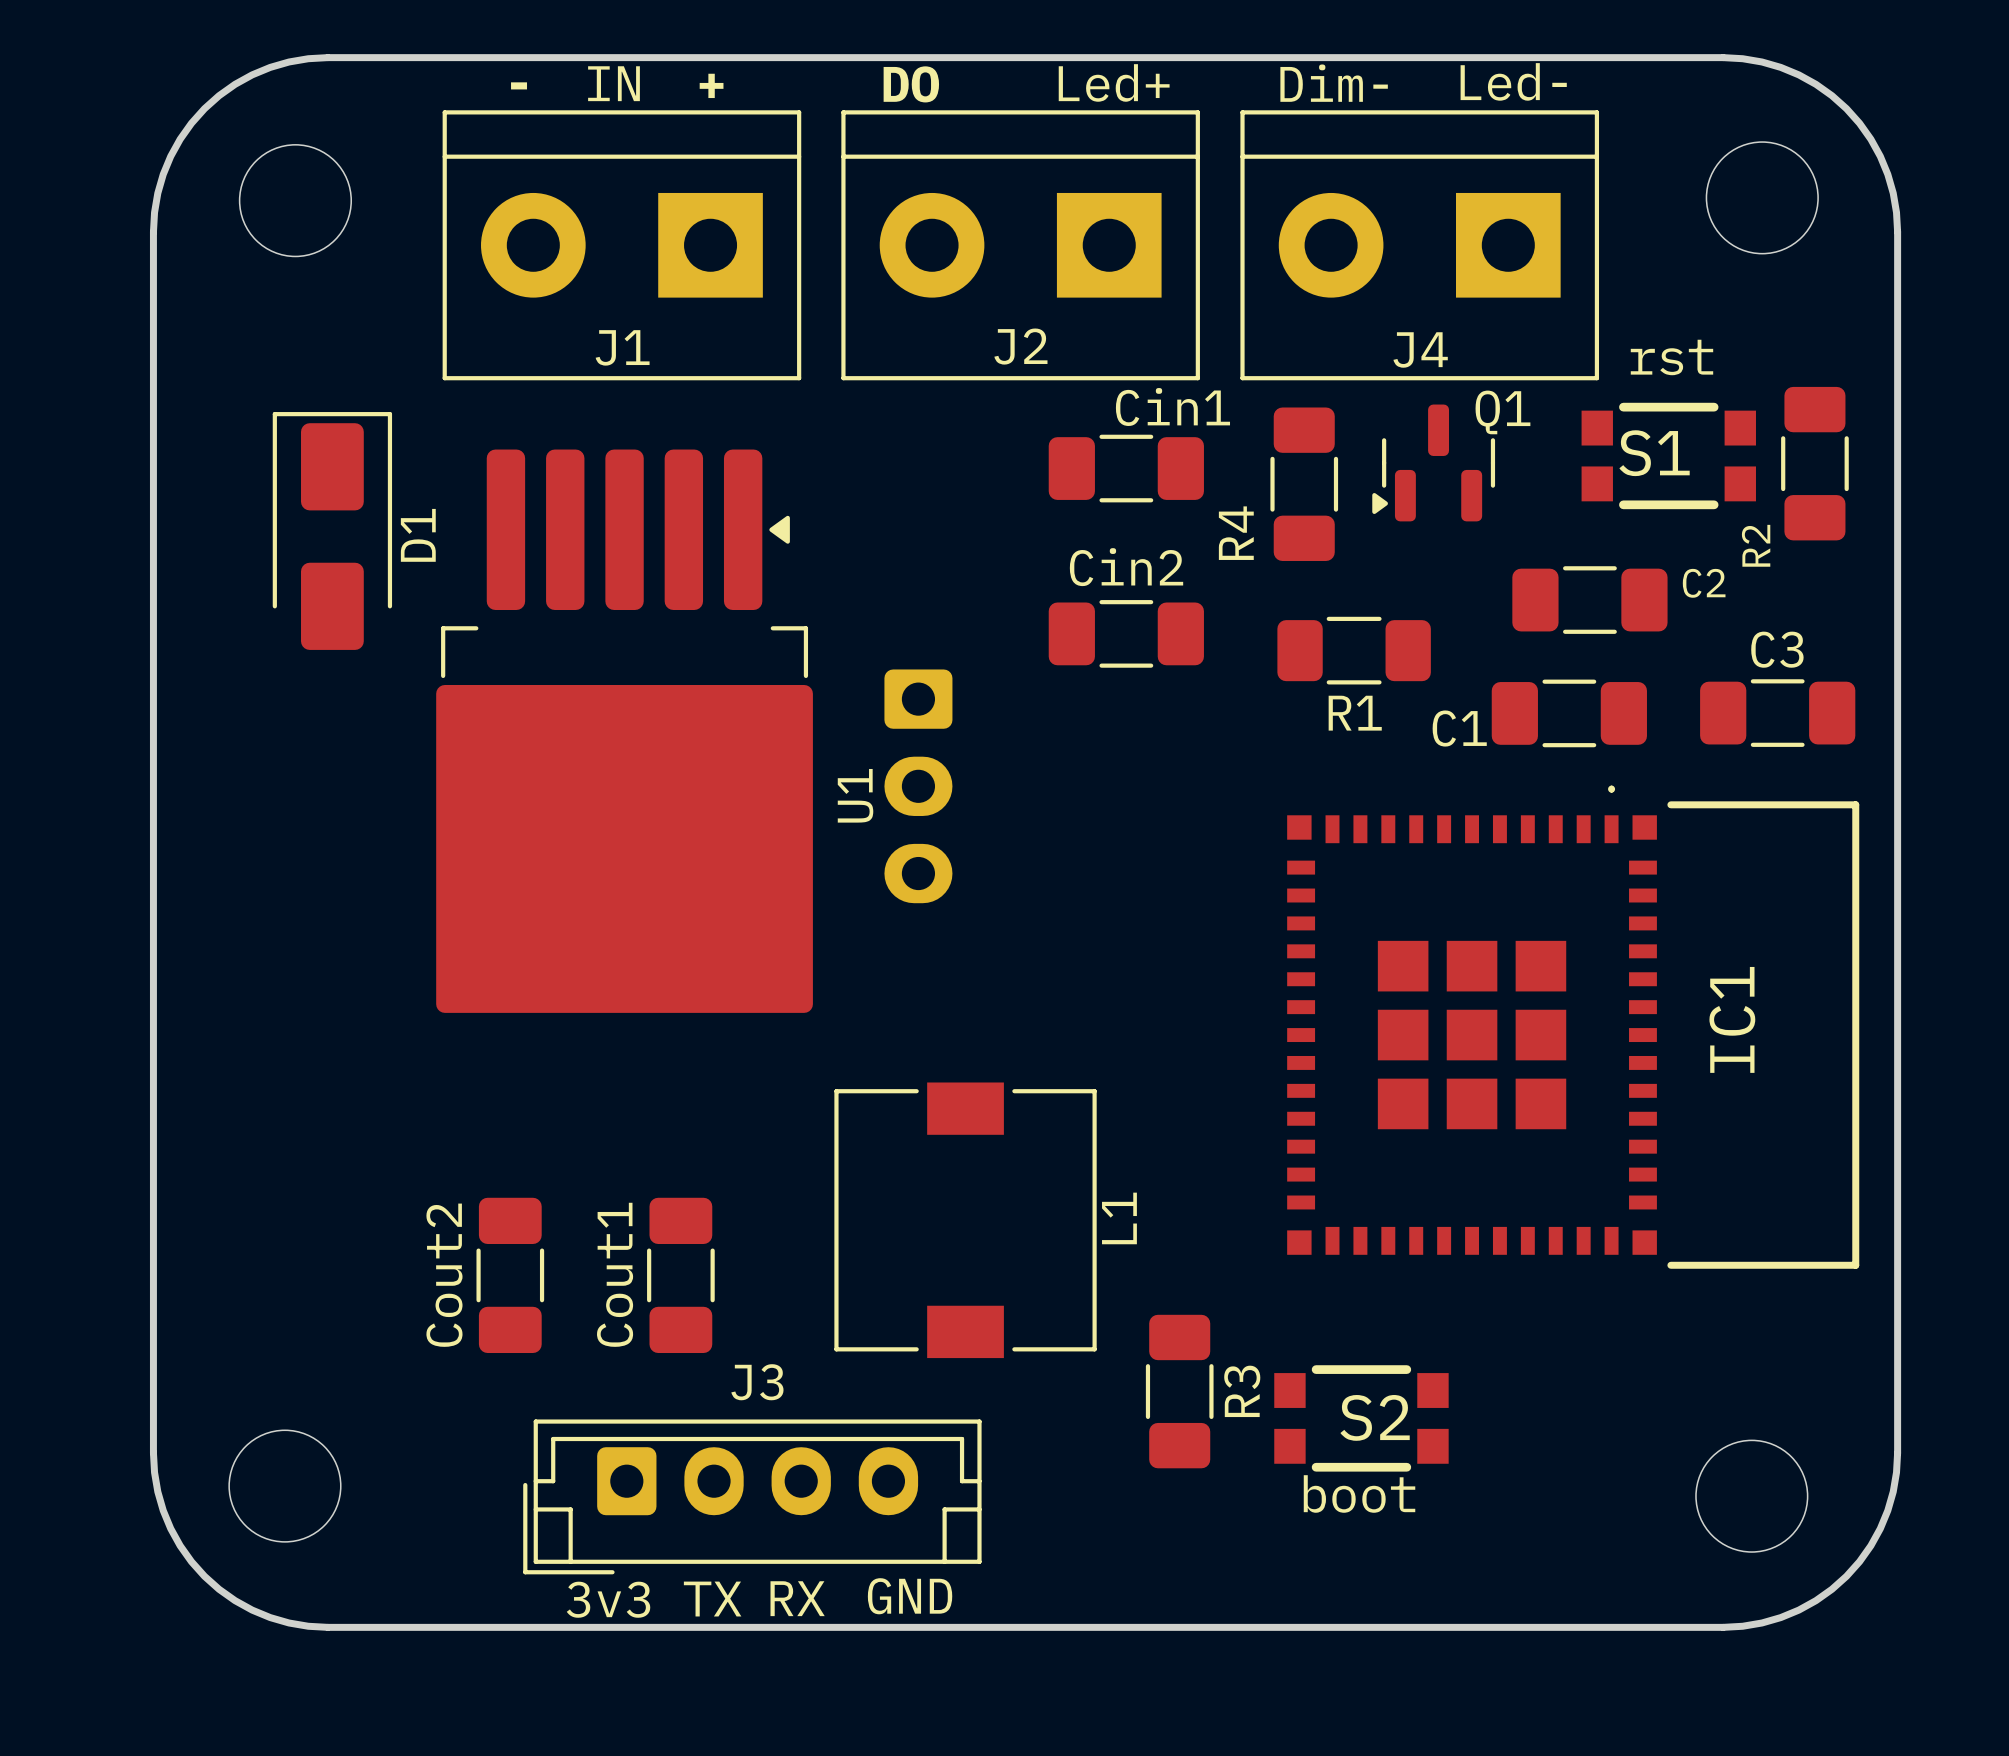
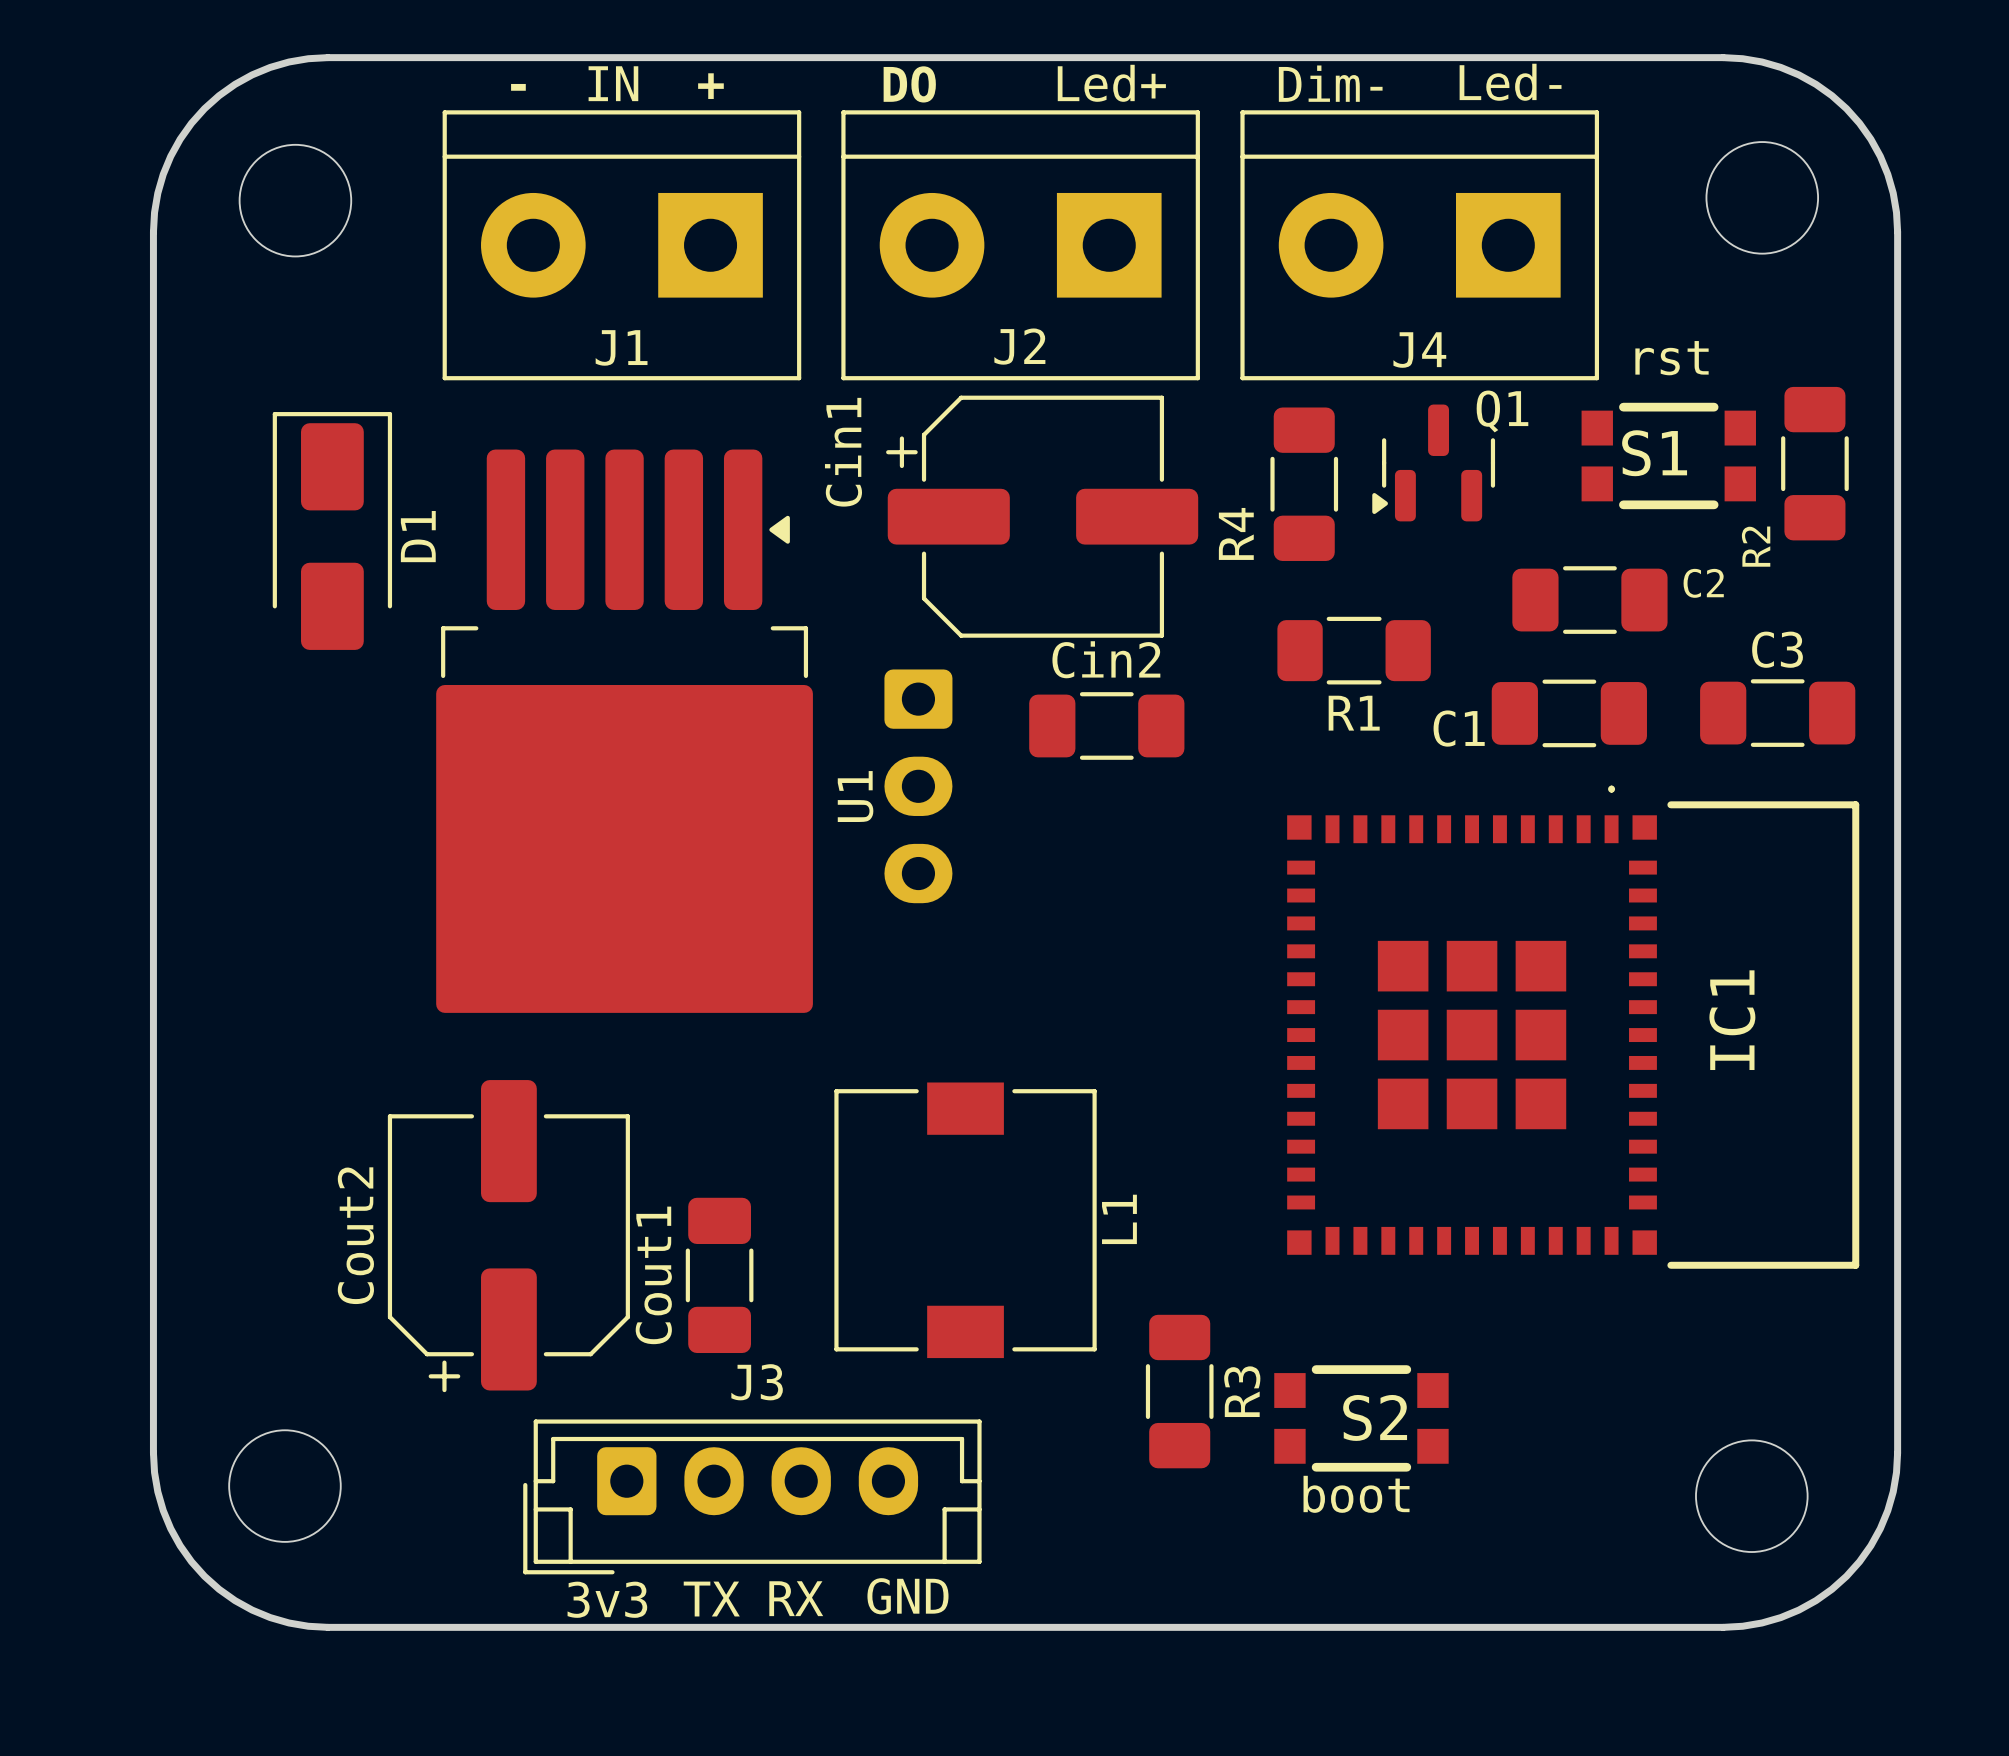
Cin1 name position: Cin1 (1172, 406) -> Cin1 (843, 452)
Cin1 footprint: [1048, 434, 1204, 503] -> [886, 395, 1199, 638]
Cin2 position: (1126, 633) -> (1106, 725)
Cout2 footprint: [476, 1197, 545, 1354] -> [387, 1080, 630, 1393]
Cout2 name position: Cout2 (444, 1275) -> Cout2 (355, 1235)
Cout1 position: (680, 1275) -> (719, 1275)

